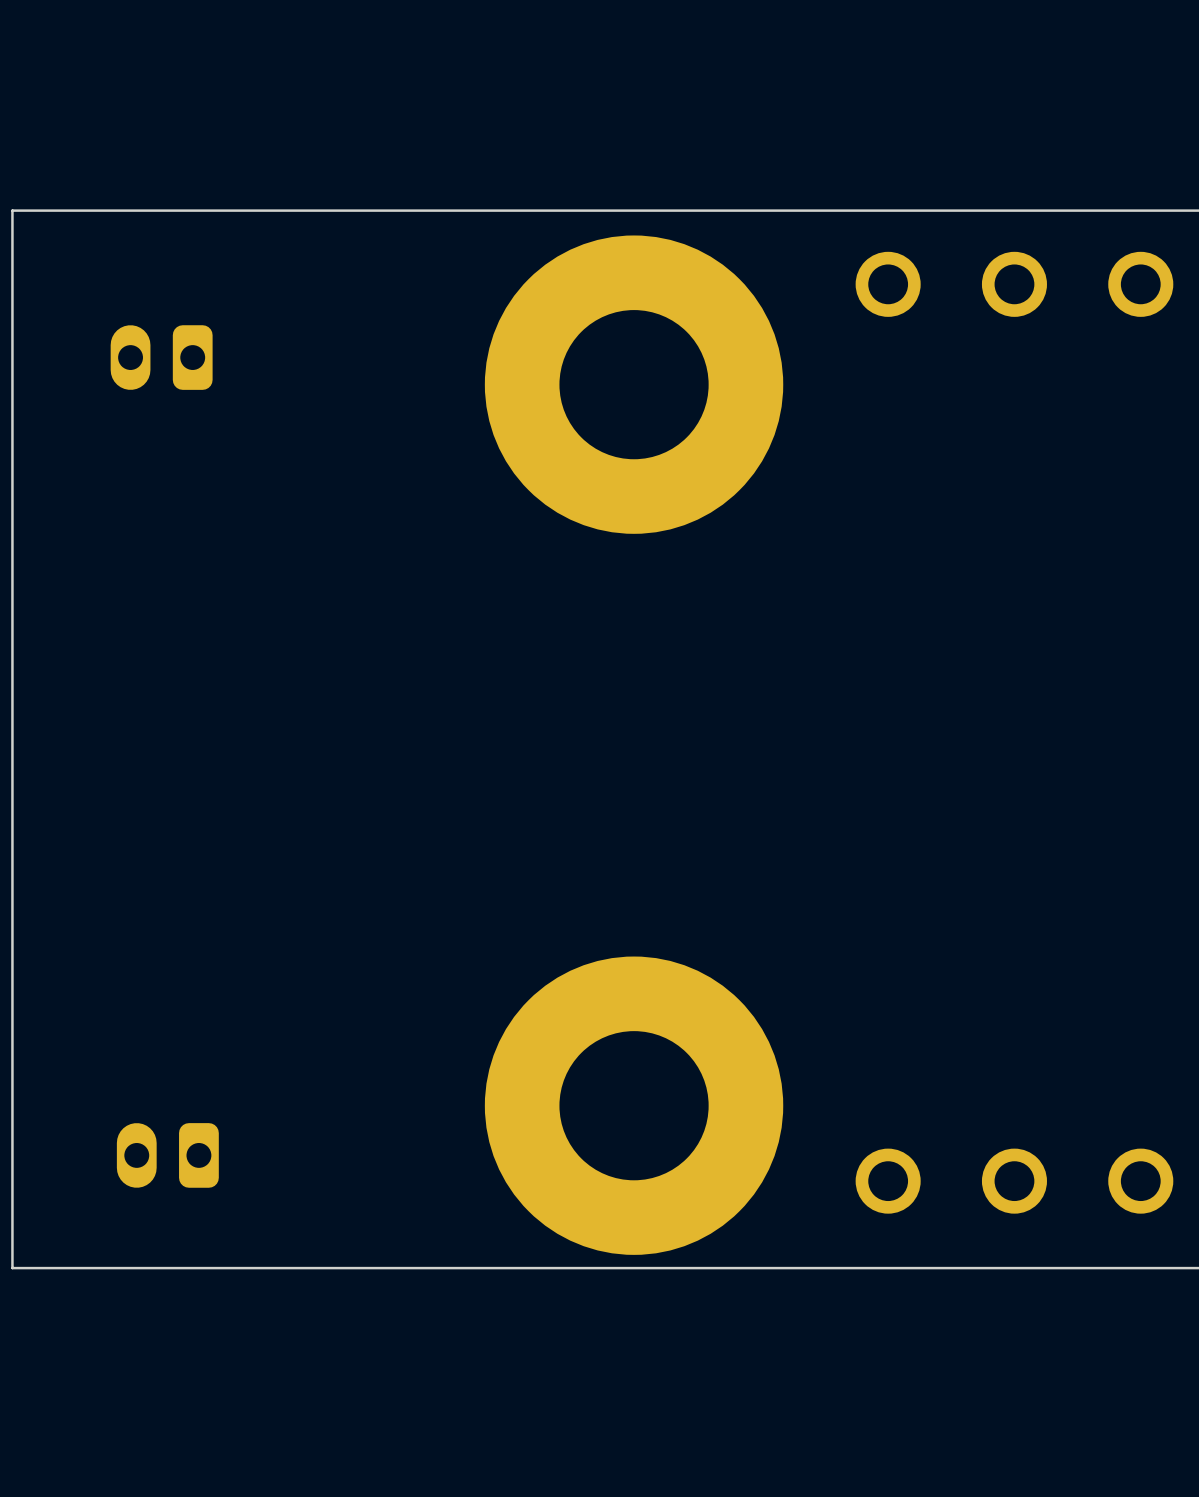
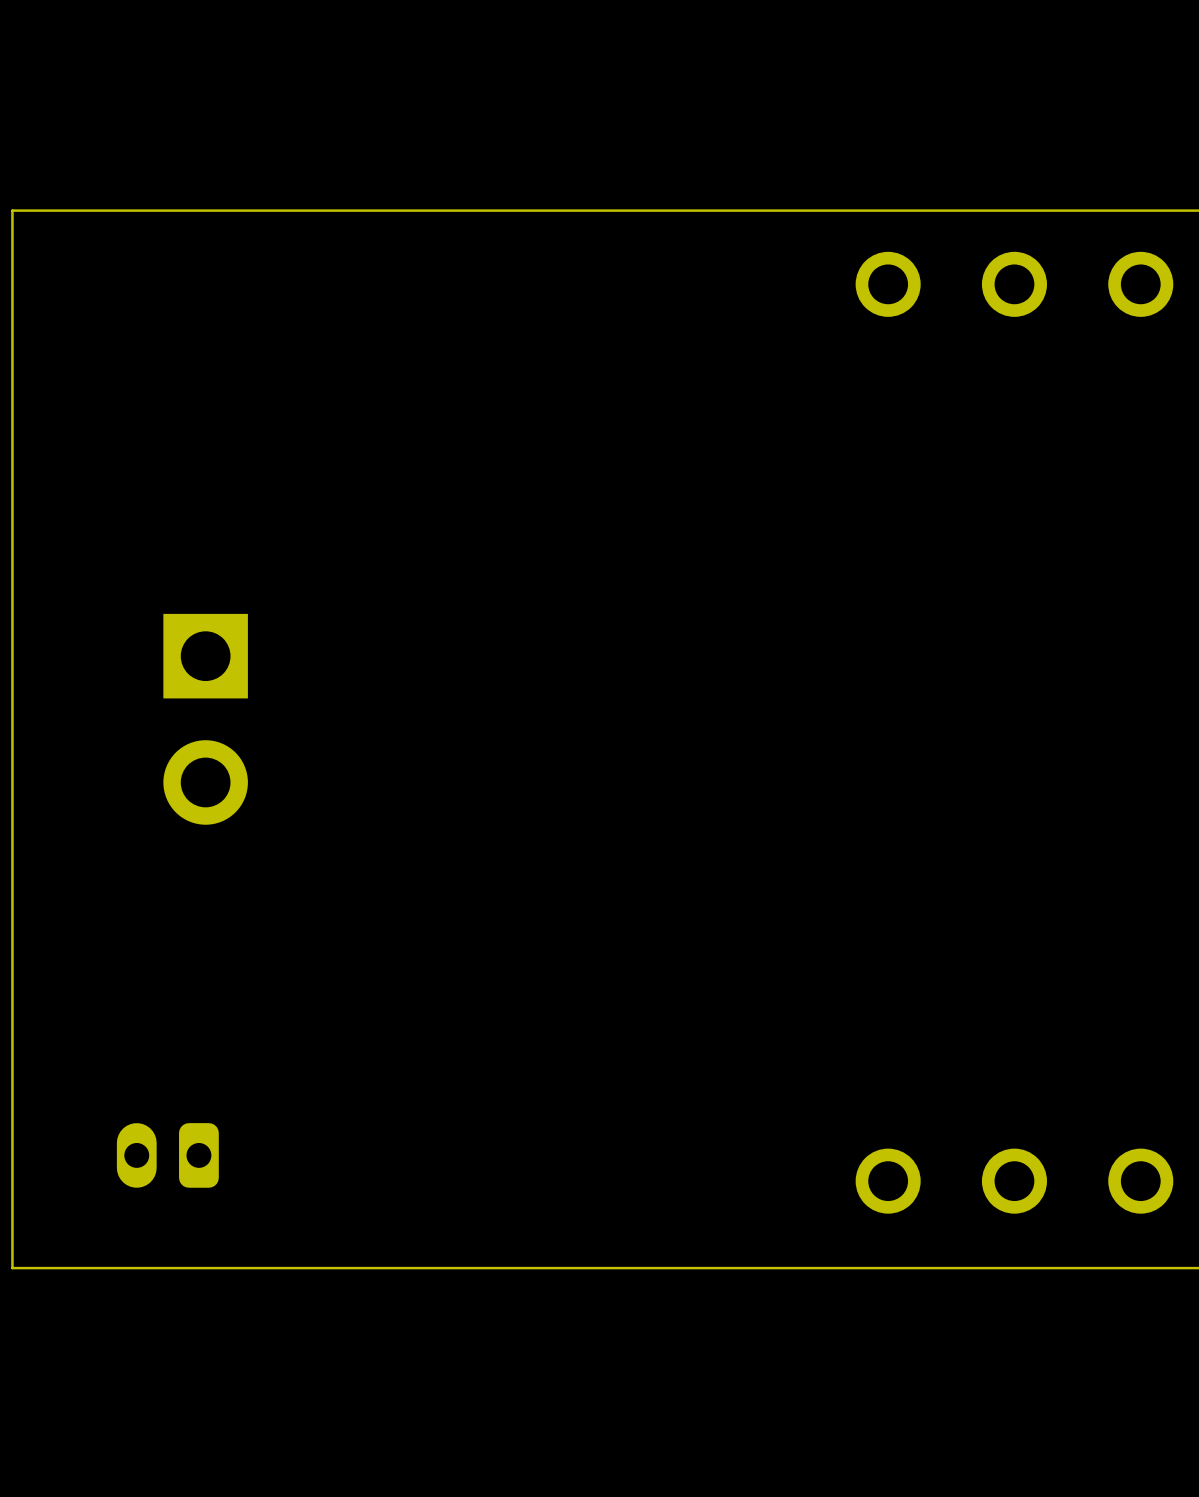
part: (161, 357) -> none
part: (634, 384) -> none
part: none -> (205, 719)
part: (634, 1105) -> none

